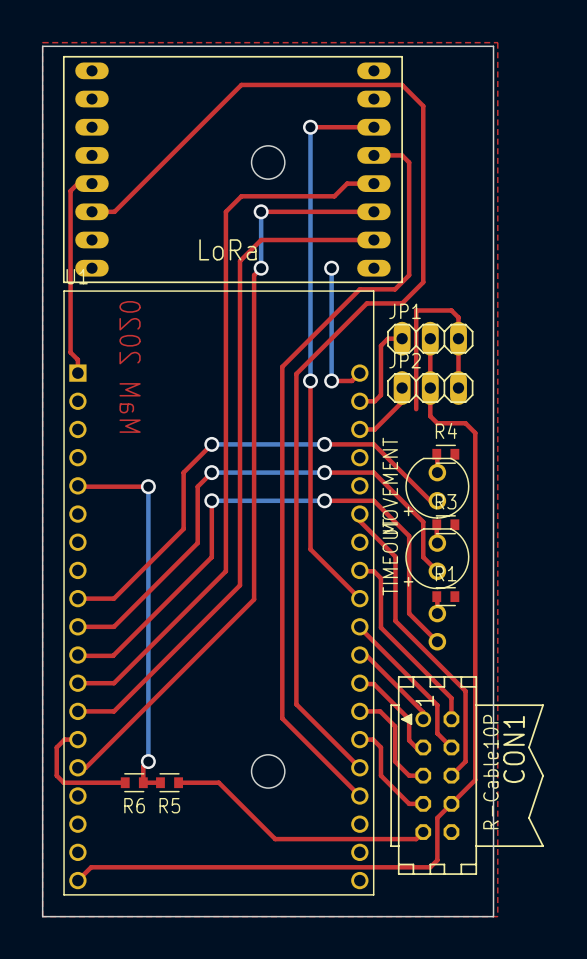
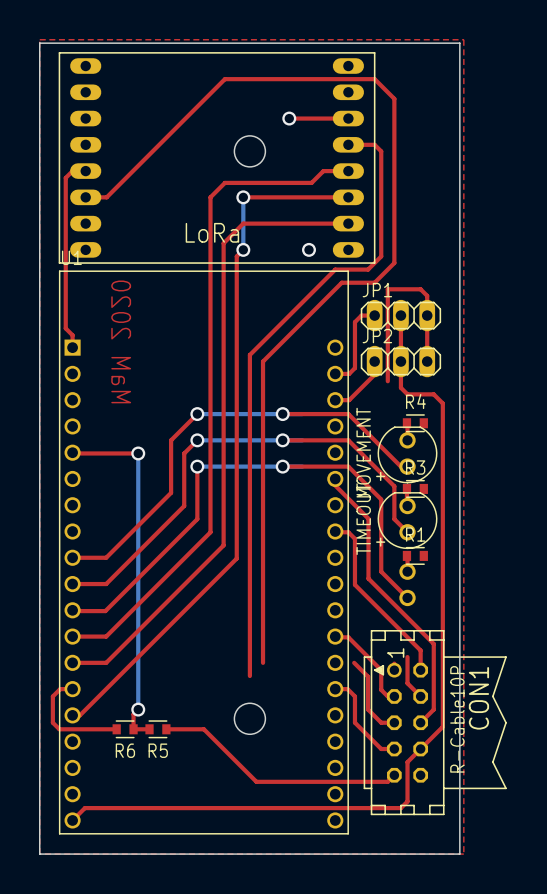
bottom track: (310, 127) (310, 380) -> none
bottom track: (331, 268) (331, 380) -> none
top track: (282, 366) (282, 388) -> (276, 348) (263, 361)
top track: none -> (263, 341) (249, 354) (249, 675)
top track: (296, 373) (296, 704) (359, 767) -> none
top track: (359, 373) (351, 380) (331, 380) -> none
top track: (310, 380) (310, 549) (359, 598) -> none
via: (310, 380) -> none
via: (331, 380) -> none
top track: none -> (282, 414) (302, 414)
via: none -> (282, 414)
via: (324, 444) -> none
top track: none -> (282, 440) (302, 440)
via: none -> (282, 440)
via: (324, 472) -> none
top track: none -> (282, 466) (302, 466)
via: none -> (282, 466)
via: (324, 500) -> none
top track: (359, 626) (437, 705) -> none
top track: (359, 655) (366, 655) (423, 712) -> none
top track: (282, 711) (282, 718) (359, 795) -> none
top track: (359, 711) (380, 711) -> none

